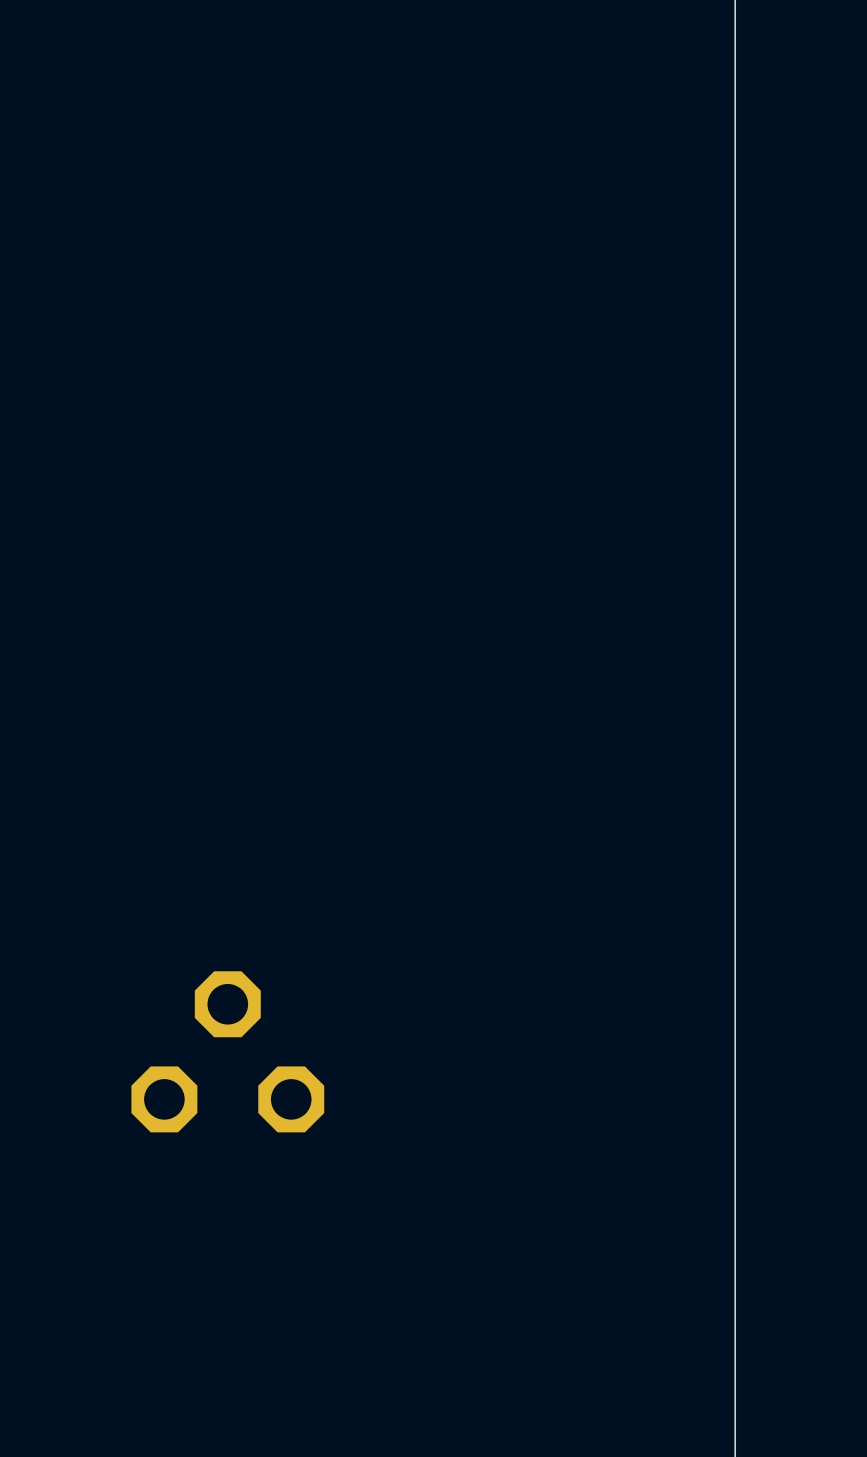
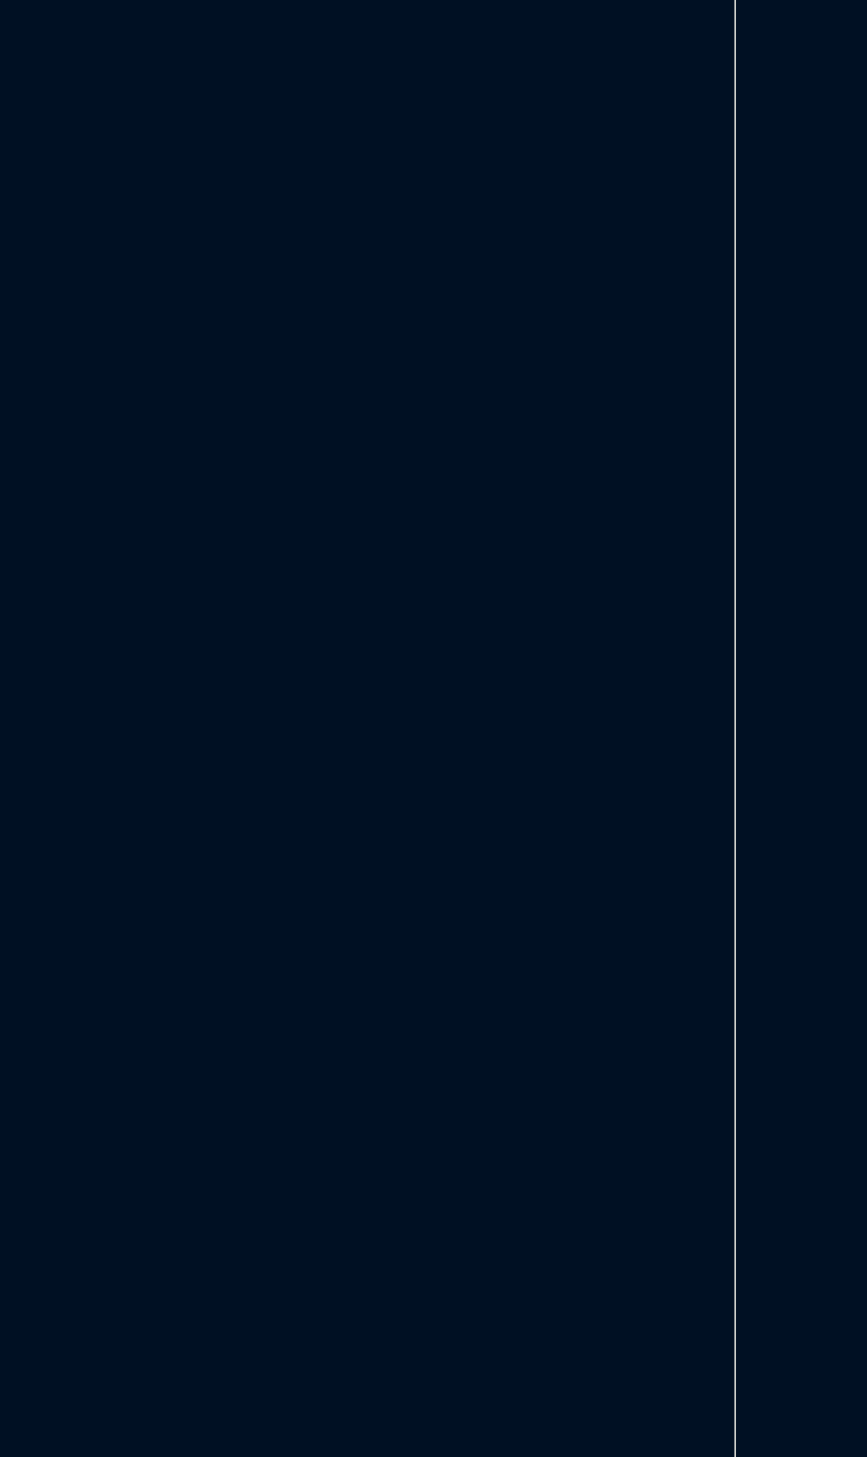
part: (227, 1051) -> none

